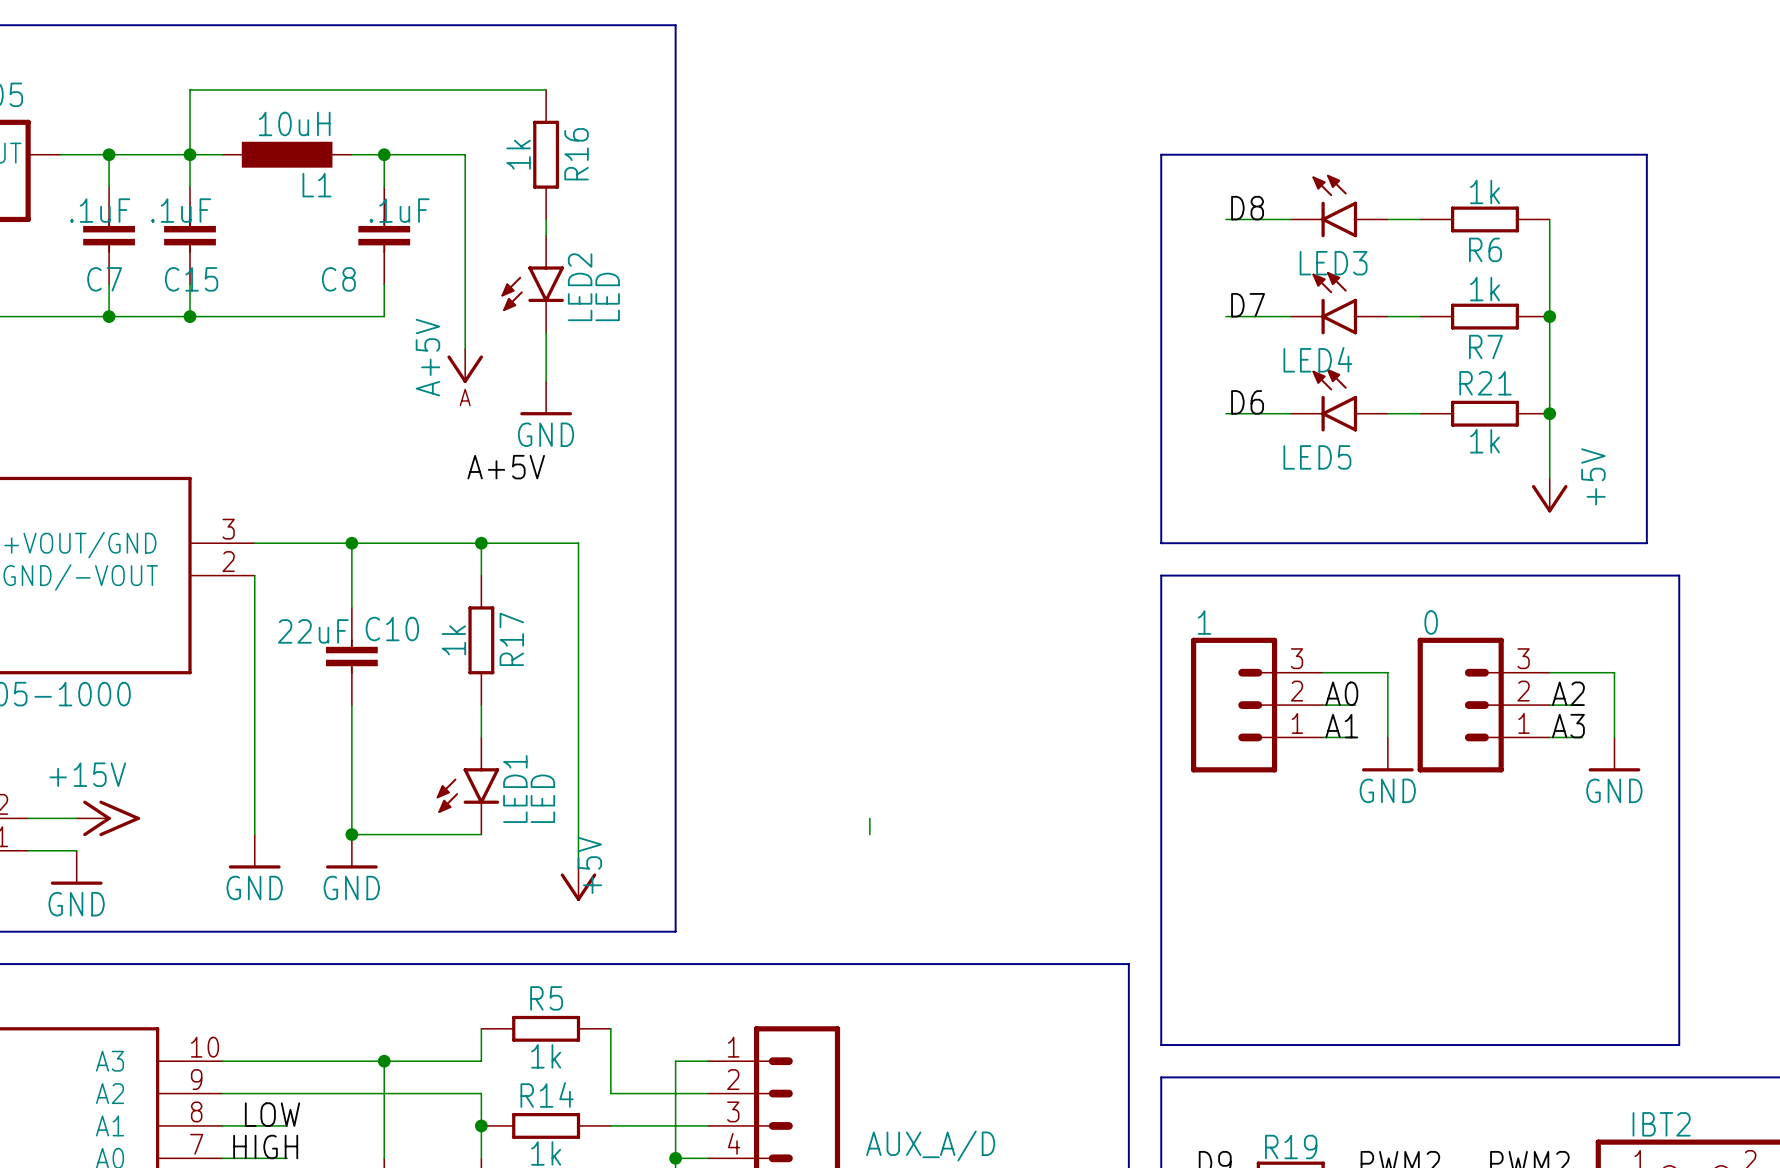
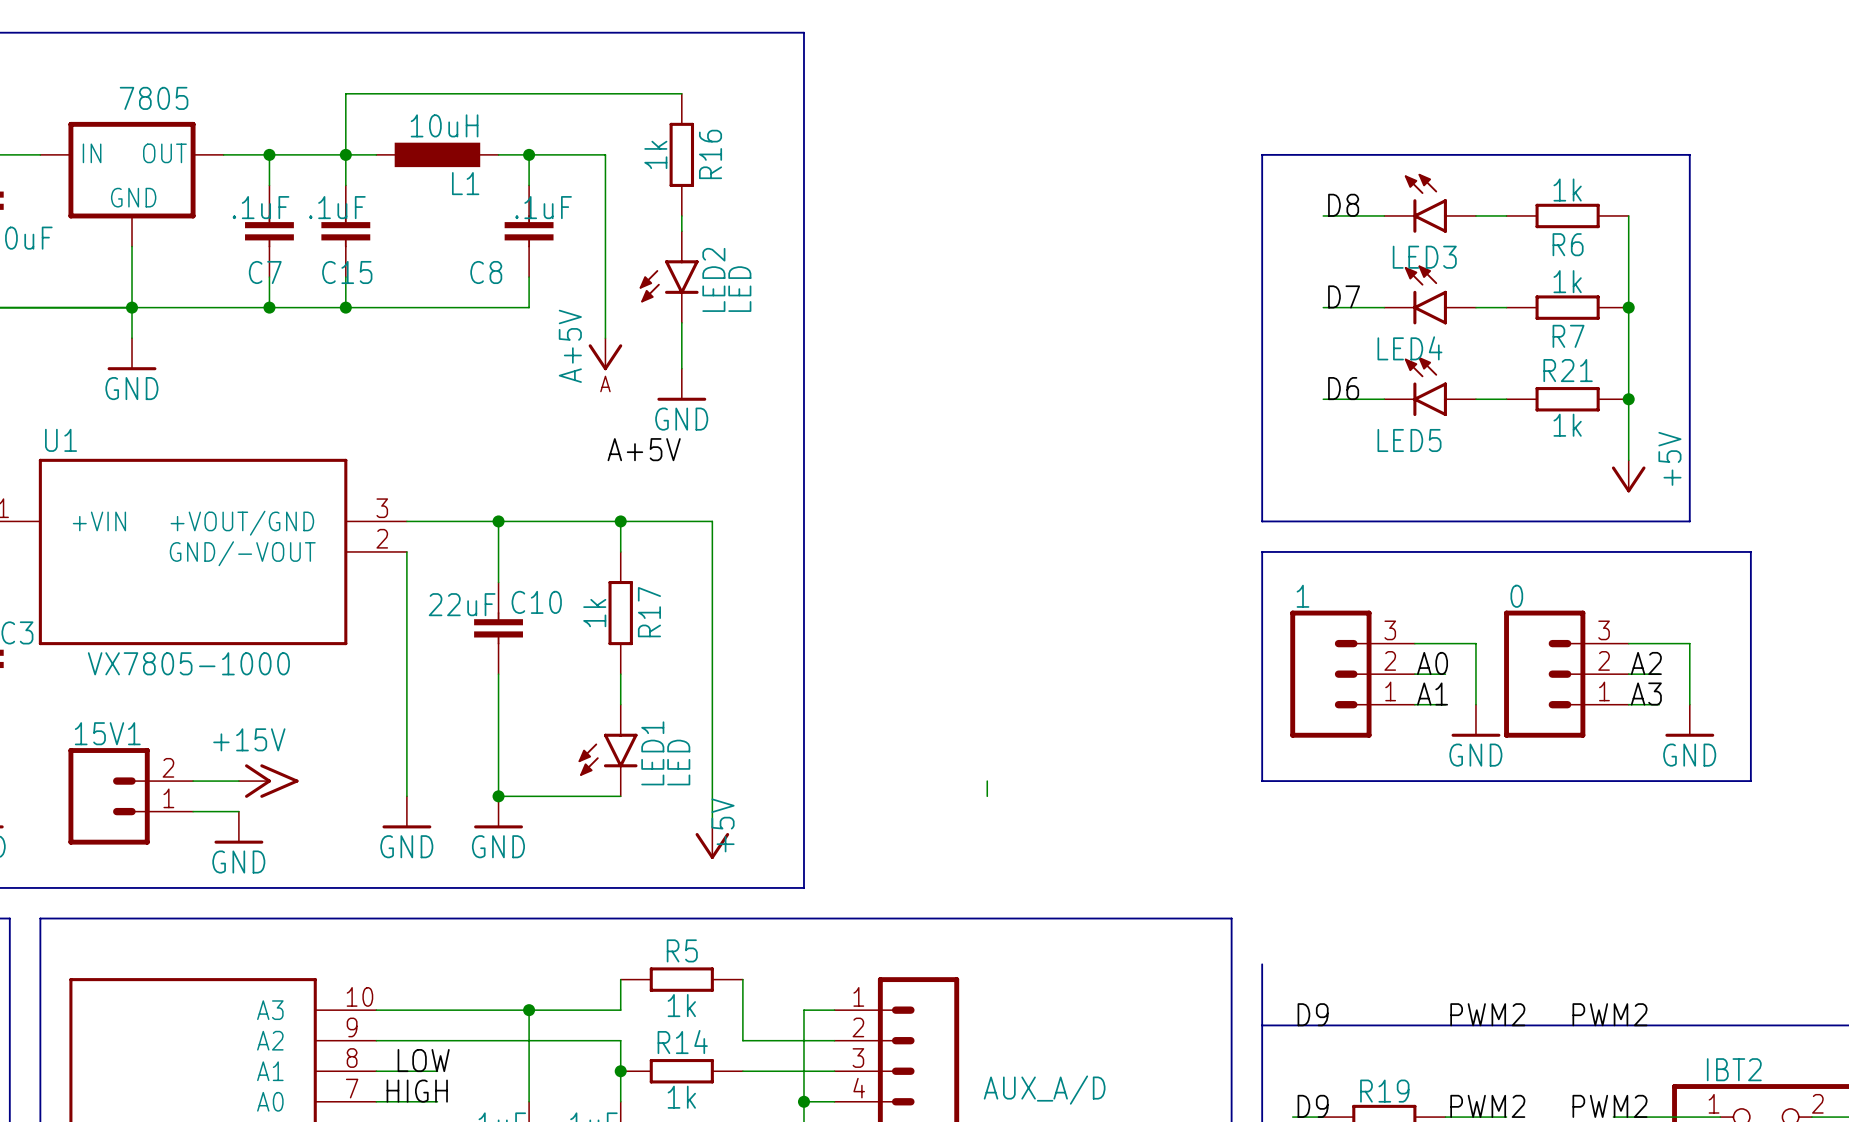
line: (1614, 154) (1646, 154) (1646, 543) (1614, 543) -> (1689, 154) (1689, 521)
line: (1161, 818) (1161, 1012) -> none
line: (1679, 818) (1679, 1045) (1161, 1045) -> (1750, 781) (1262, 781)
line: none -> (1262, 994) (1262, 1025)
label: none -> D9 (1313, 1014)
label: none -> PWM2 (1487, 1014)
label: none -> PWM2 (1609, 1014)

